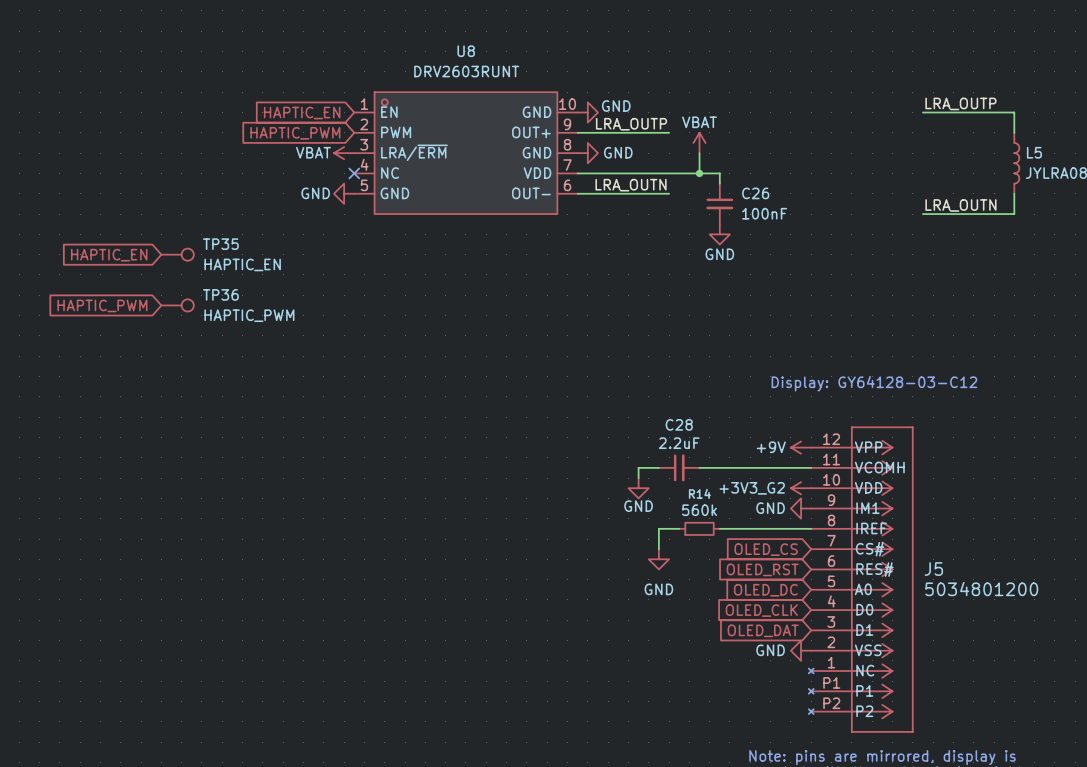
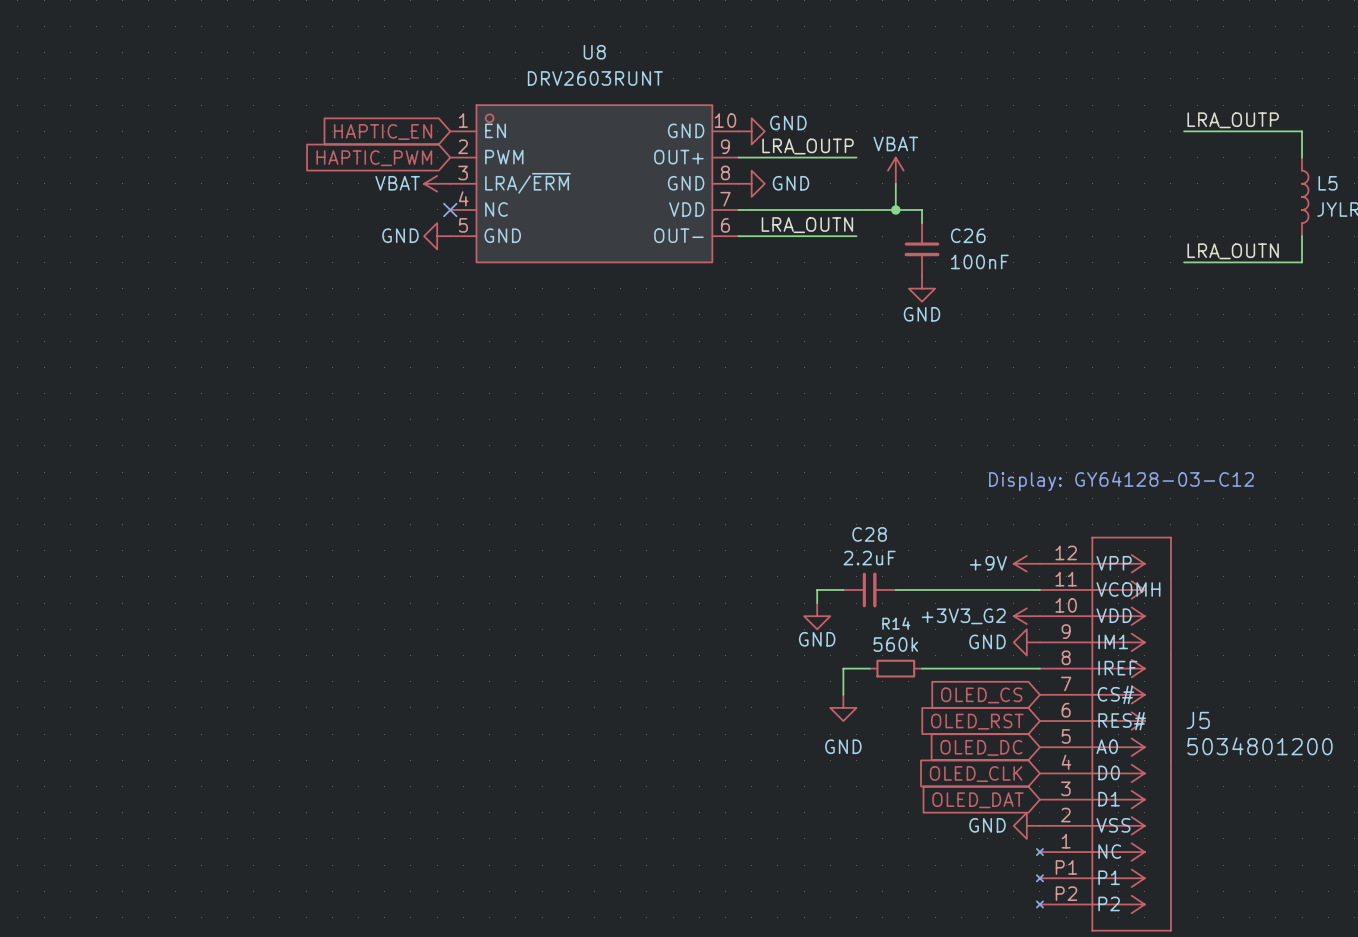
TP35: HAPTIC_EN (177, 254) -> none
global label: HAPTIC_EN (109, 255) -> none
global label: HAPTIC_PWM (102, 305) -> none
TP36: HAPTIC_PWM (177, 305) -> none

